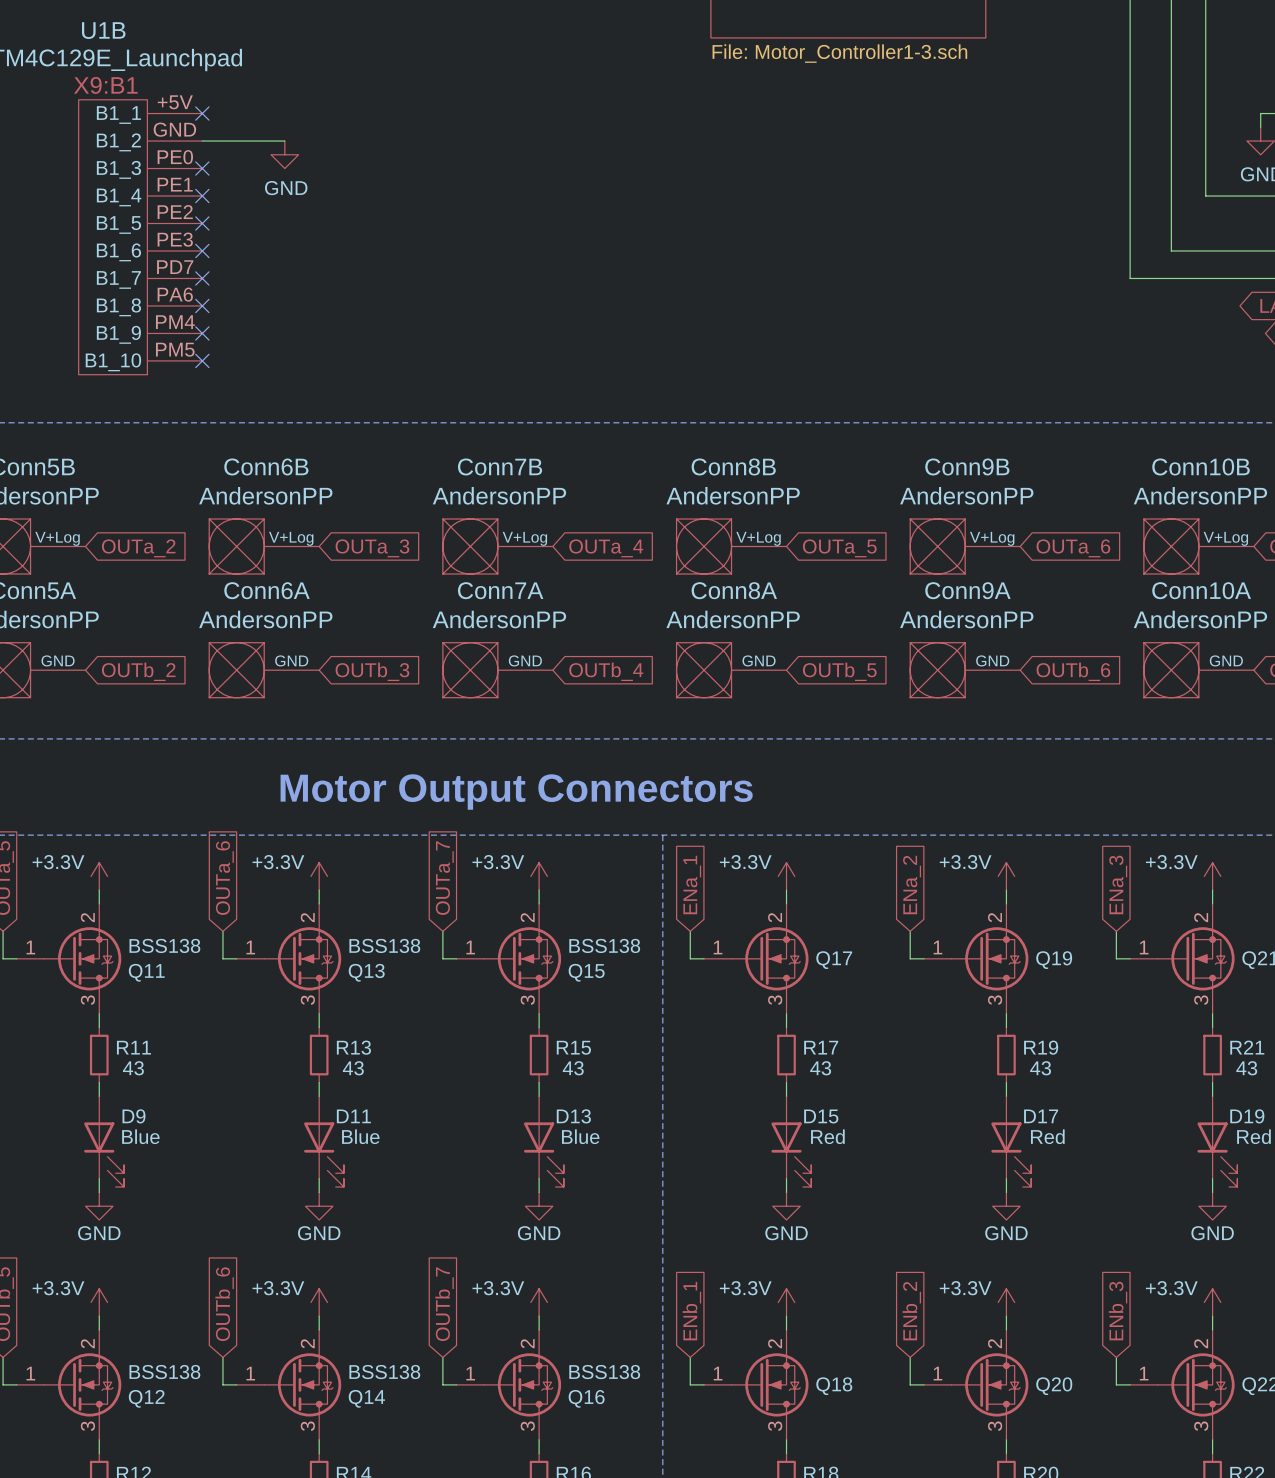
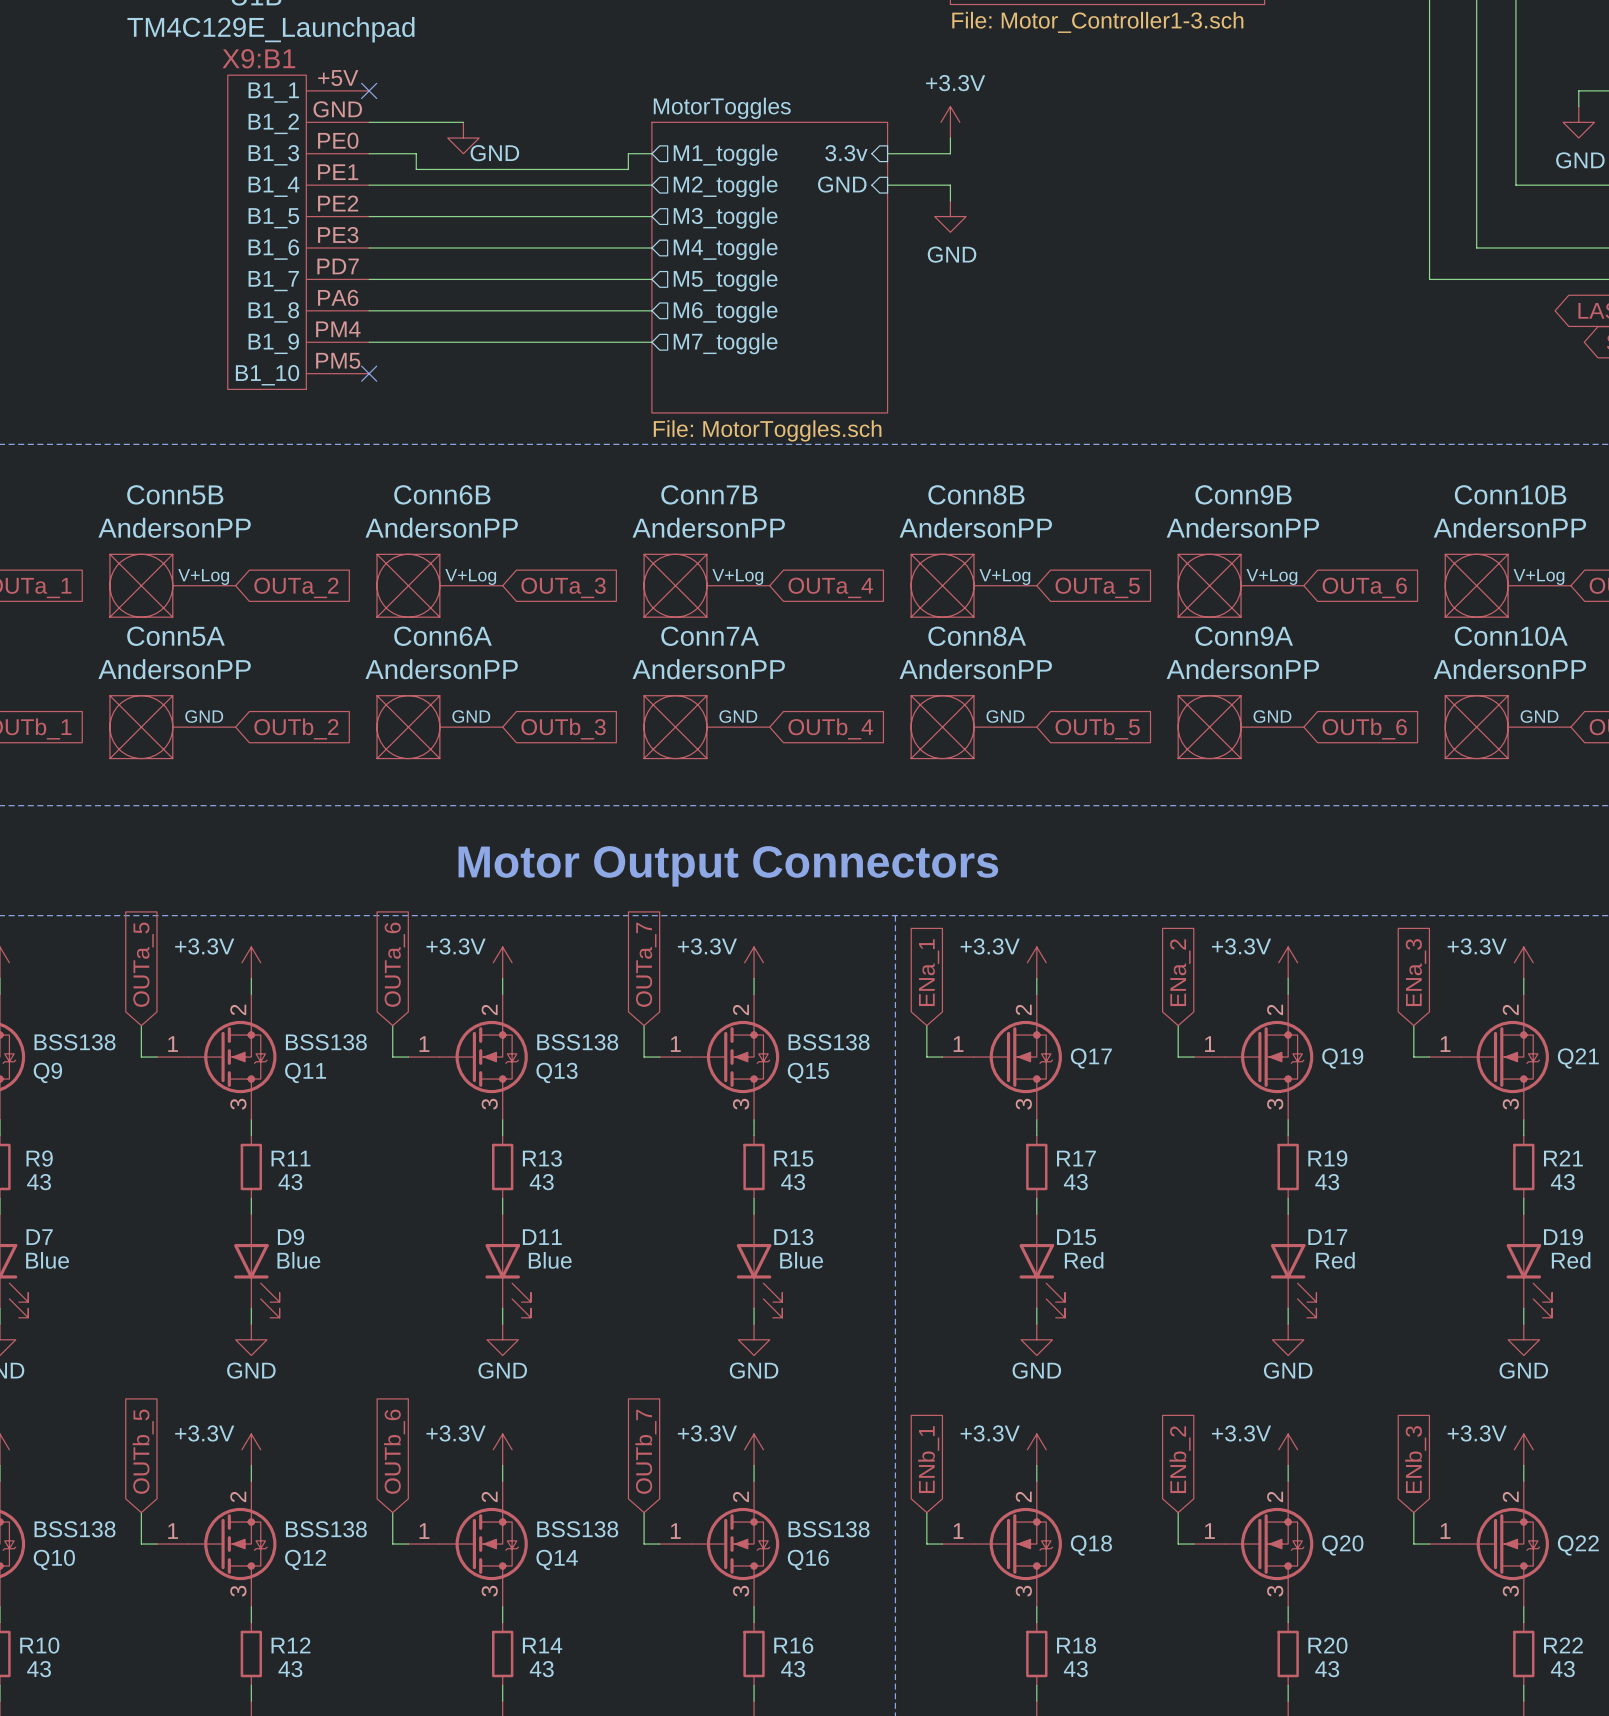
power symbol: none -> +3.3V (950, 122)
wire: none -> (950, 138) (950, 153) (887, 153)
wire: none -> (369, 153) (416, 153) (416, 169) (628, 169) (628, 153) (651, 153)
no-connect mark: (202, 168) -> none
sheet pin: none -> 3.3v (846, 153)
sheet pin: none -> M1_toggle (725, 155)
power symbol text position: GND (286, 188) -> GND (494, 153)
sheet pin: none -> GND (842, 184)
wire: none -> (369, 185) (651, 185)
no-connect mark: (202, 196) -> none
wire: none -> (887, 185) (950, 185) (950, 200)
sheet pin: none -> M2_toggle (725, 186)
wire: none -> (369, 216) (651, 216)
no-connect mark: (202, 223) -> none
power symbol: none -> GND (950, 216)
sheet pin: none -> M3_toggle (725, 217)
wire: none -> (369, 247) (651, 247)
no-connect mark: (202, 250) -> none
sheet pin: none -> M4_toggle (725, 249)
sheet MotorToggles: none -> File: MotorToggles.sch (769, 267)
wire: none -> (369, 279) (651, 279)
no-connect mark: (202, 278) -> none
sheet pin: none -> M5_toggle (725, 280)
wire: none -> (369, 310) (651, 310)
no-connect mark: (202, 305) -> none
sheet pin: none -> M6_toggle (725, 312)
wire: none -> (369, 342) (651, 342)
no-connect mark: (202, 333) -> none
sheet pin: none -> M7_toggle (725, 343)

